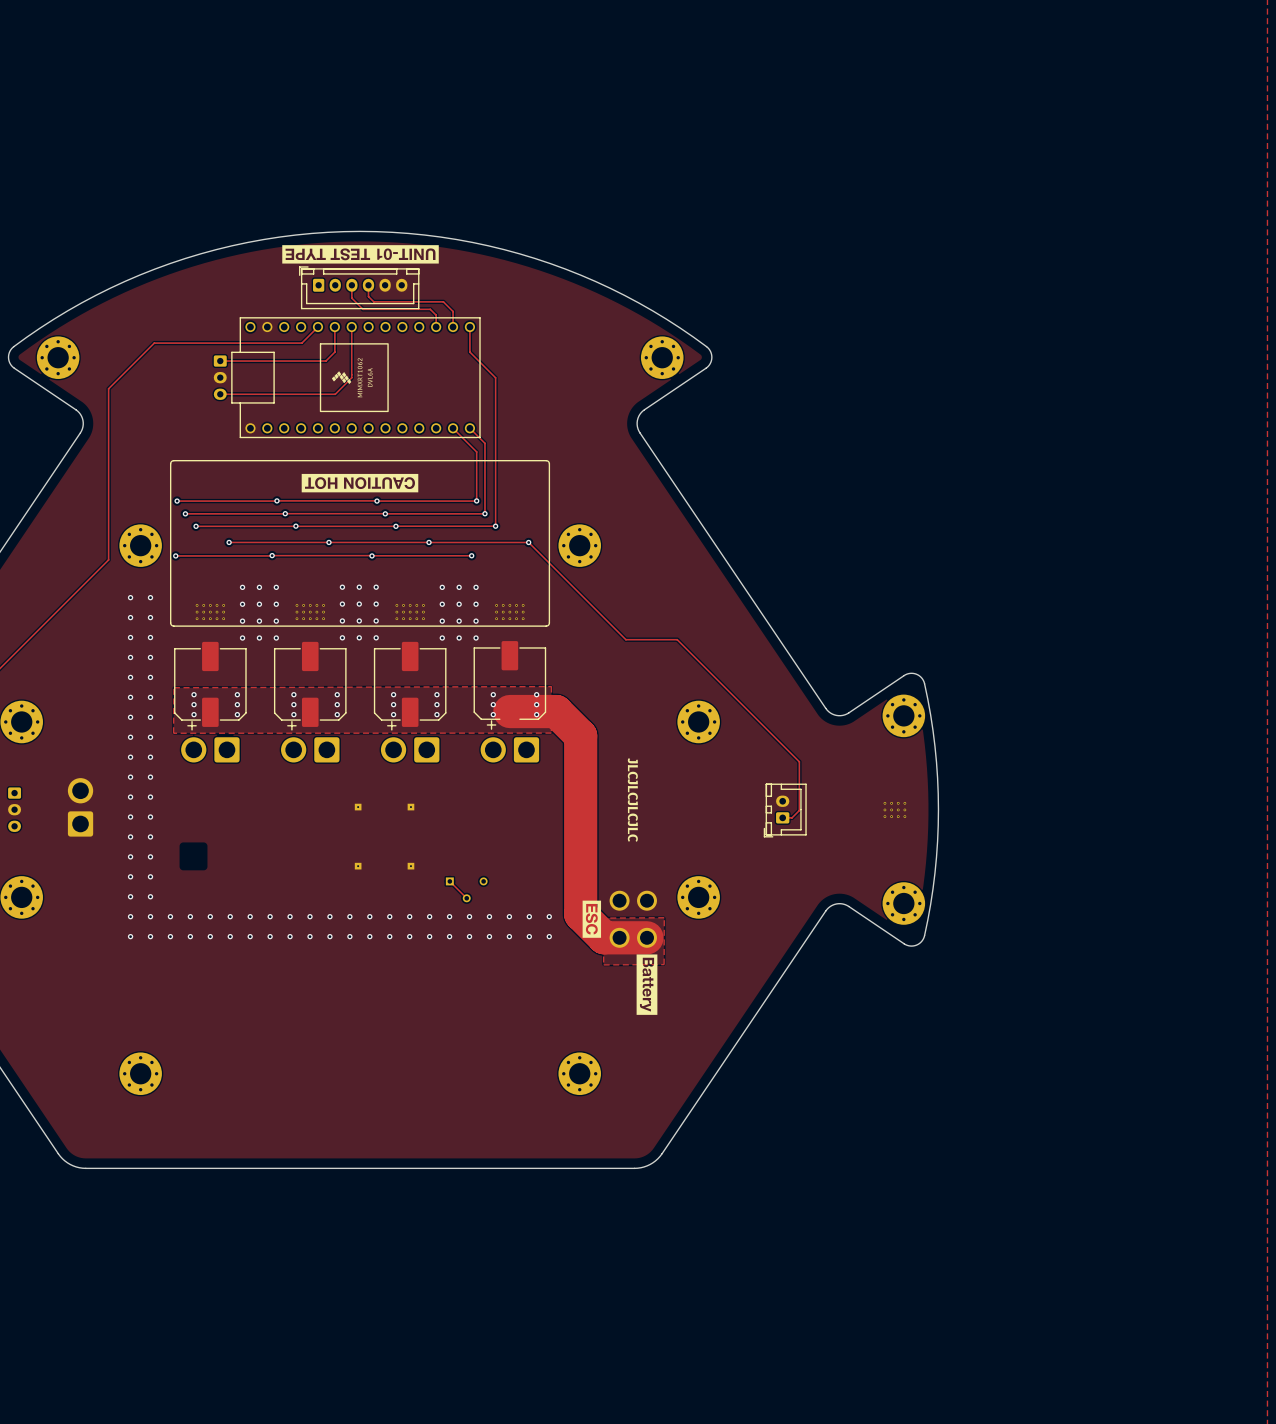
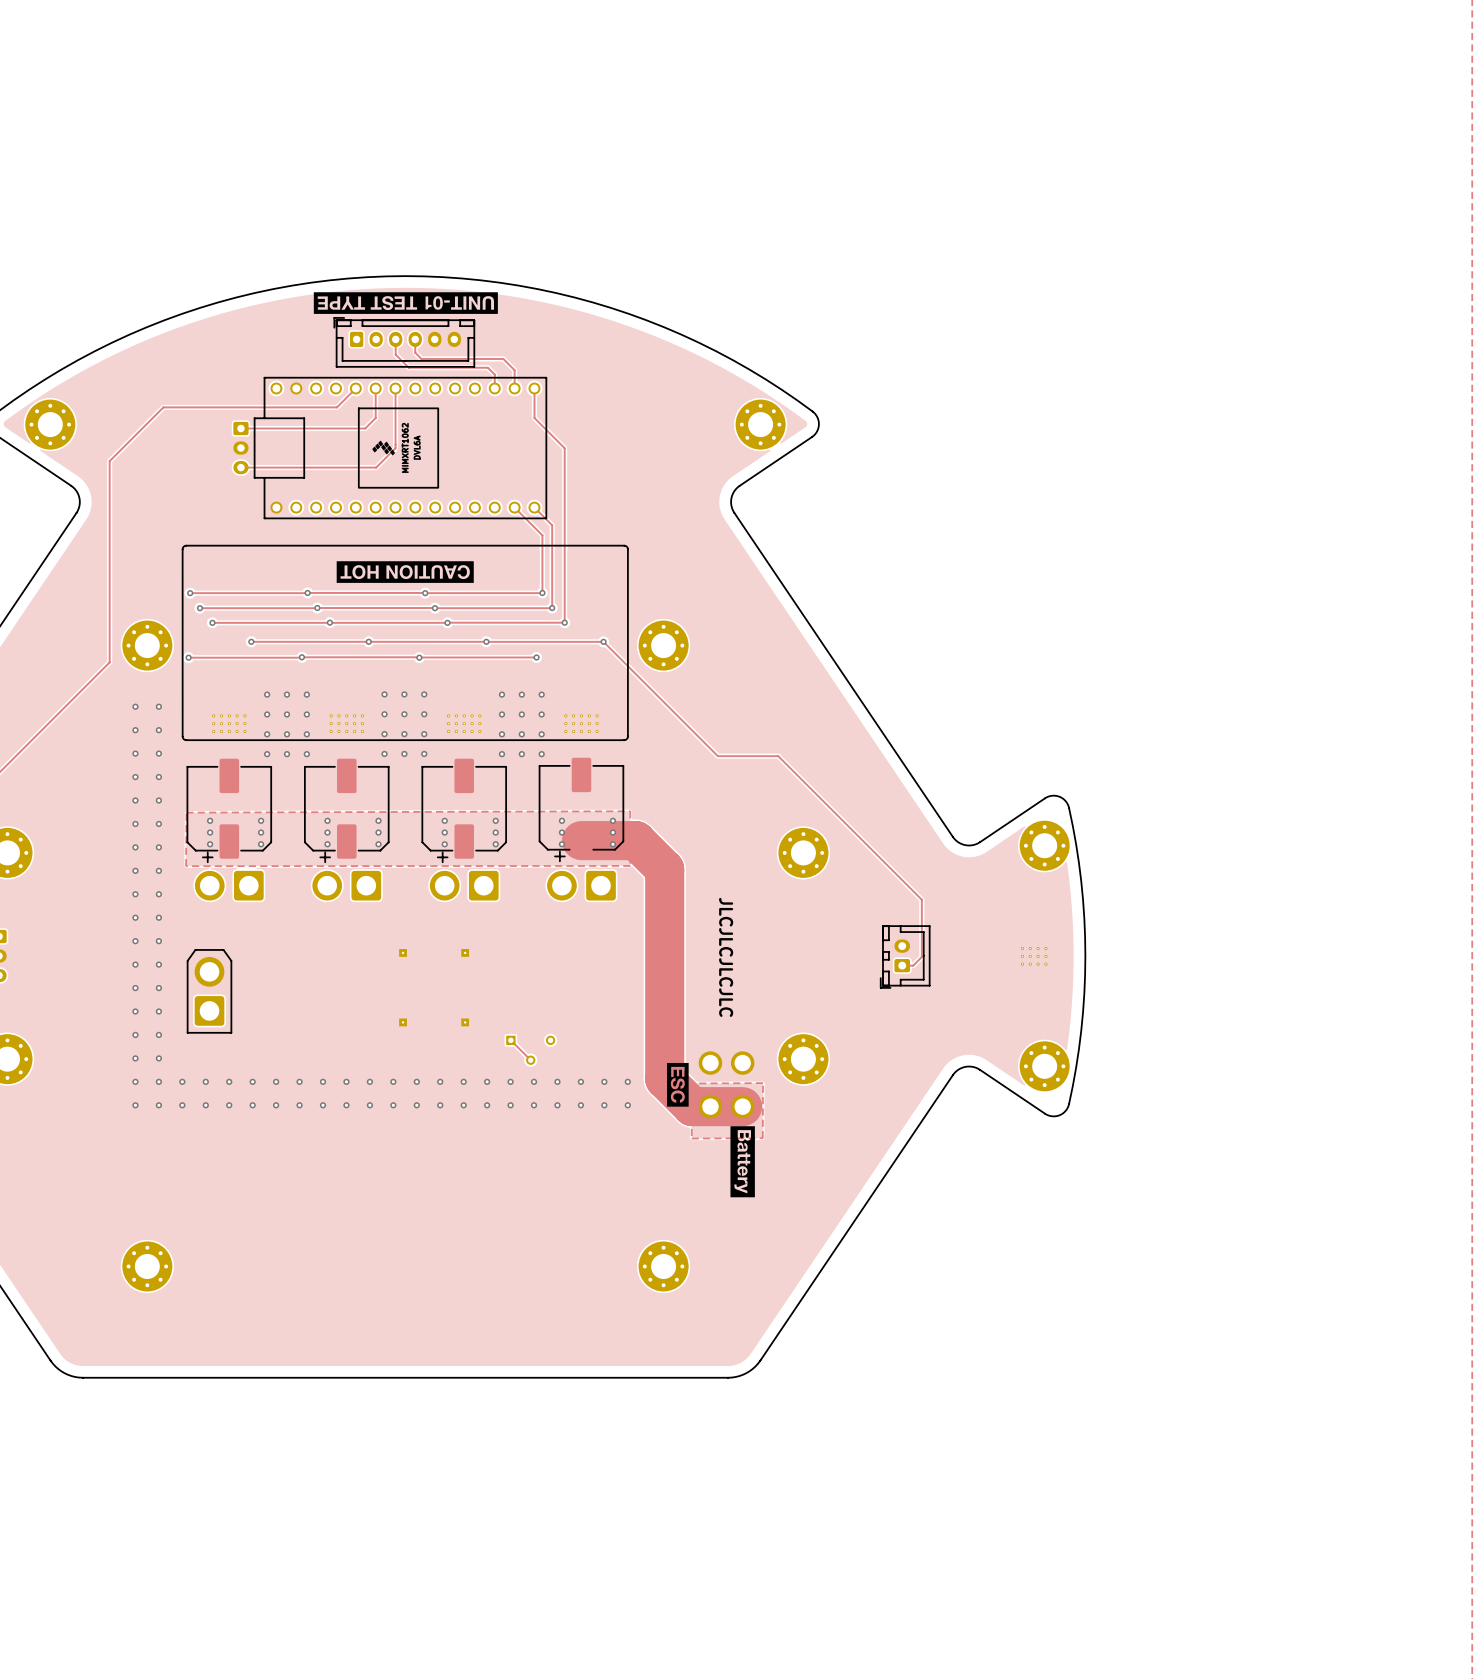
part side: bottom (80, 807) -> top (209, 991)

